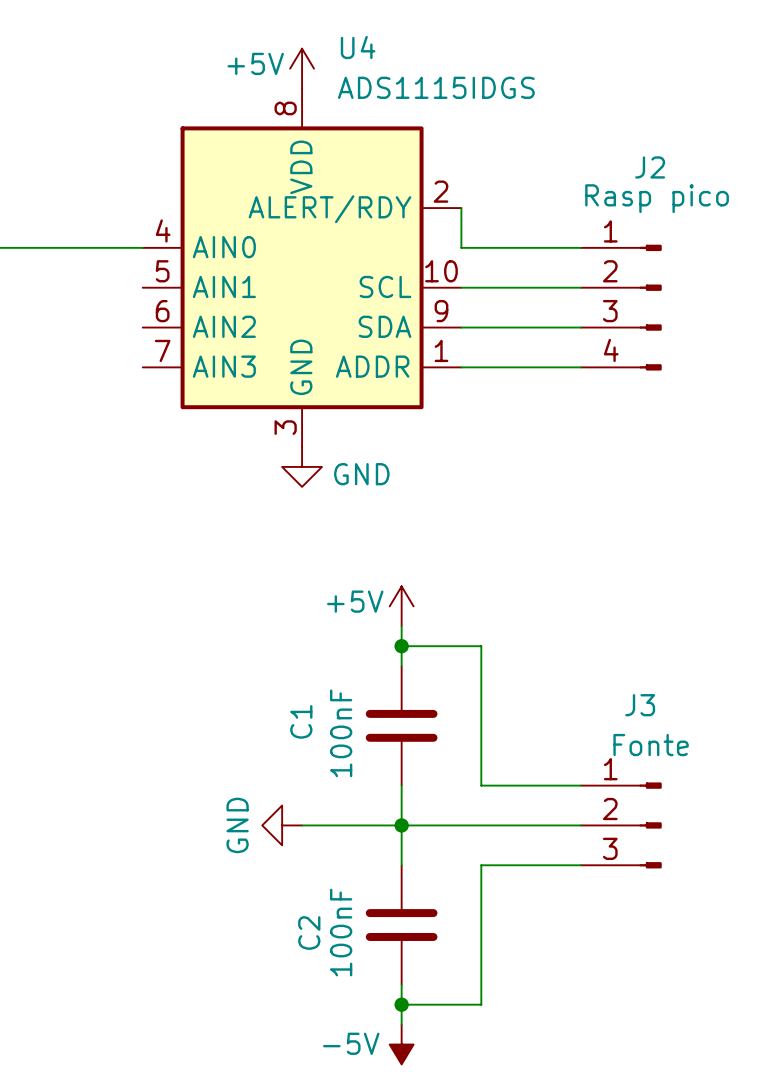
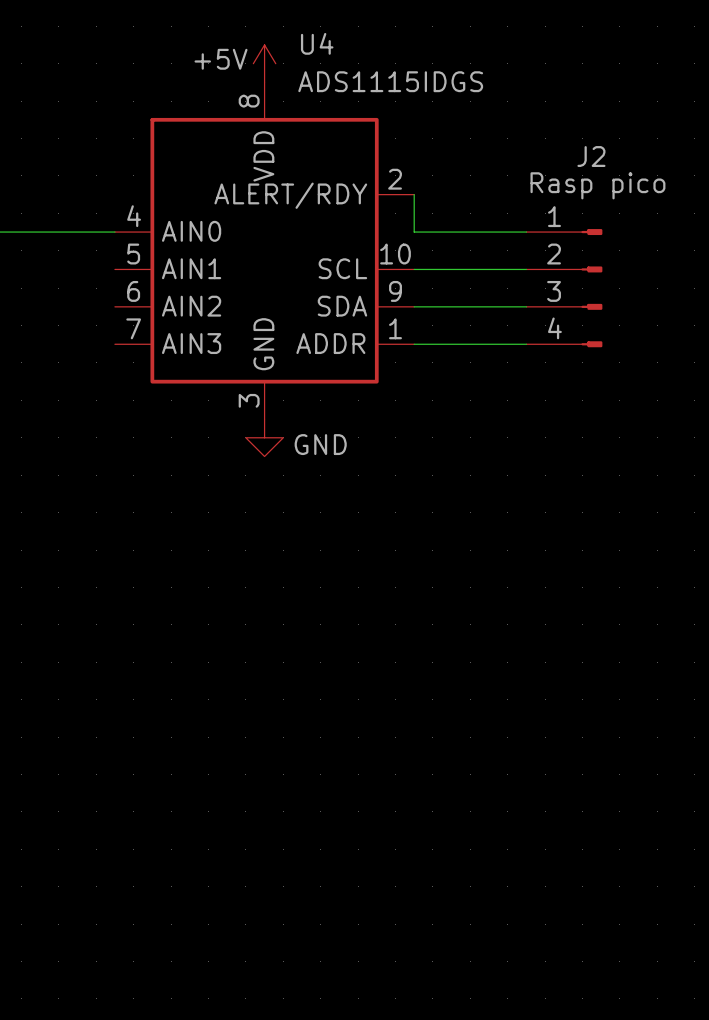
power symbol: +5V (401, 606) -> none
wire: (401, 626) (401, 666) -> none
wire: (401, 646) (481, 646) (481, 785) (580, 785) -> none
junction: (401, 646) -> none
C1: 100nF (401, 725) -> none
wire: (401, 785) (401, 865) -> none
power symbol: GND (282, 825) -> none
wire: (302, 825) (580, 825) -> none
junction: (401, 825) -> none
J3: Fonte (621, 825) -> none
wire: (580, 865) (481, 865) (481, 1004) (401, 1004) -> none
C2: 100nF (401, 925) -> none
wire: (401, 984) (401, 1024) -> none
junction: (401, 1004) -> none
power symbol: -5V (401, 1044) -> none

